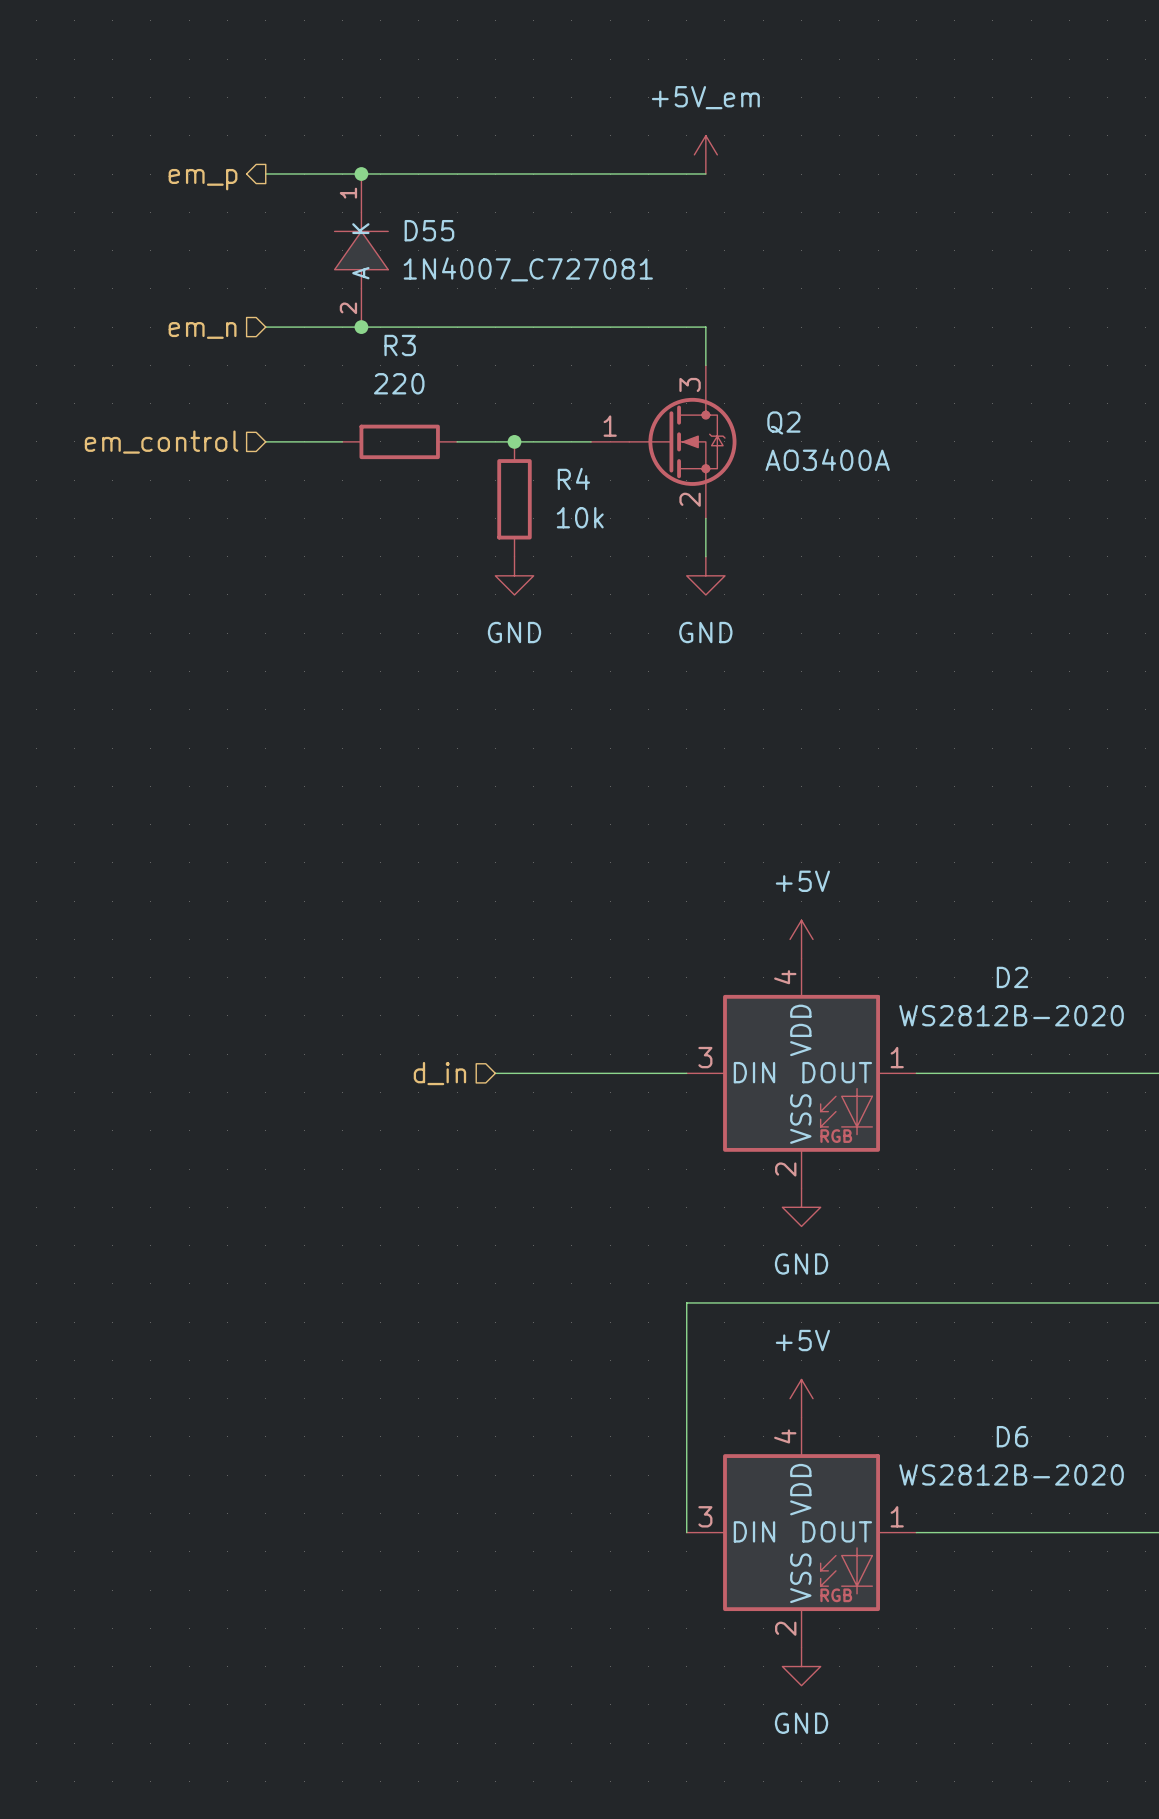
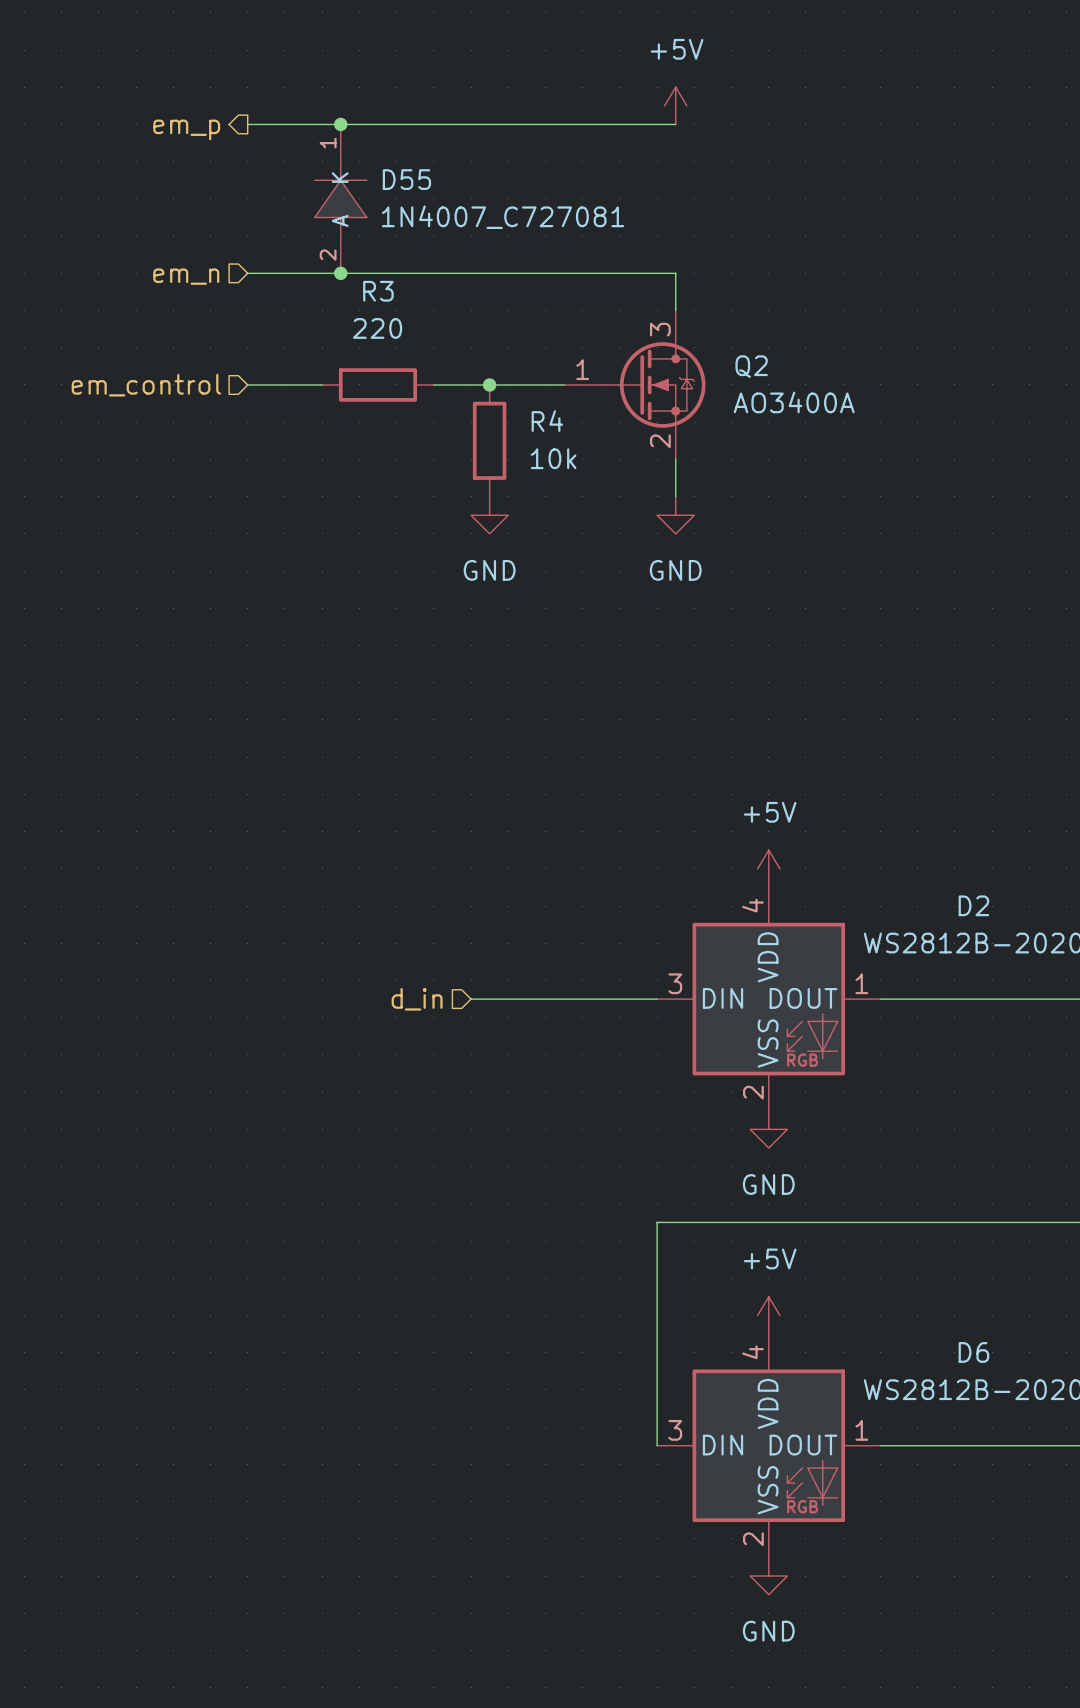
power symbol: +5V_em (705, 154) -> +5V (675, 105)

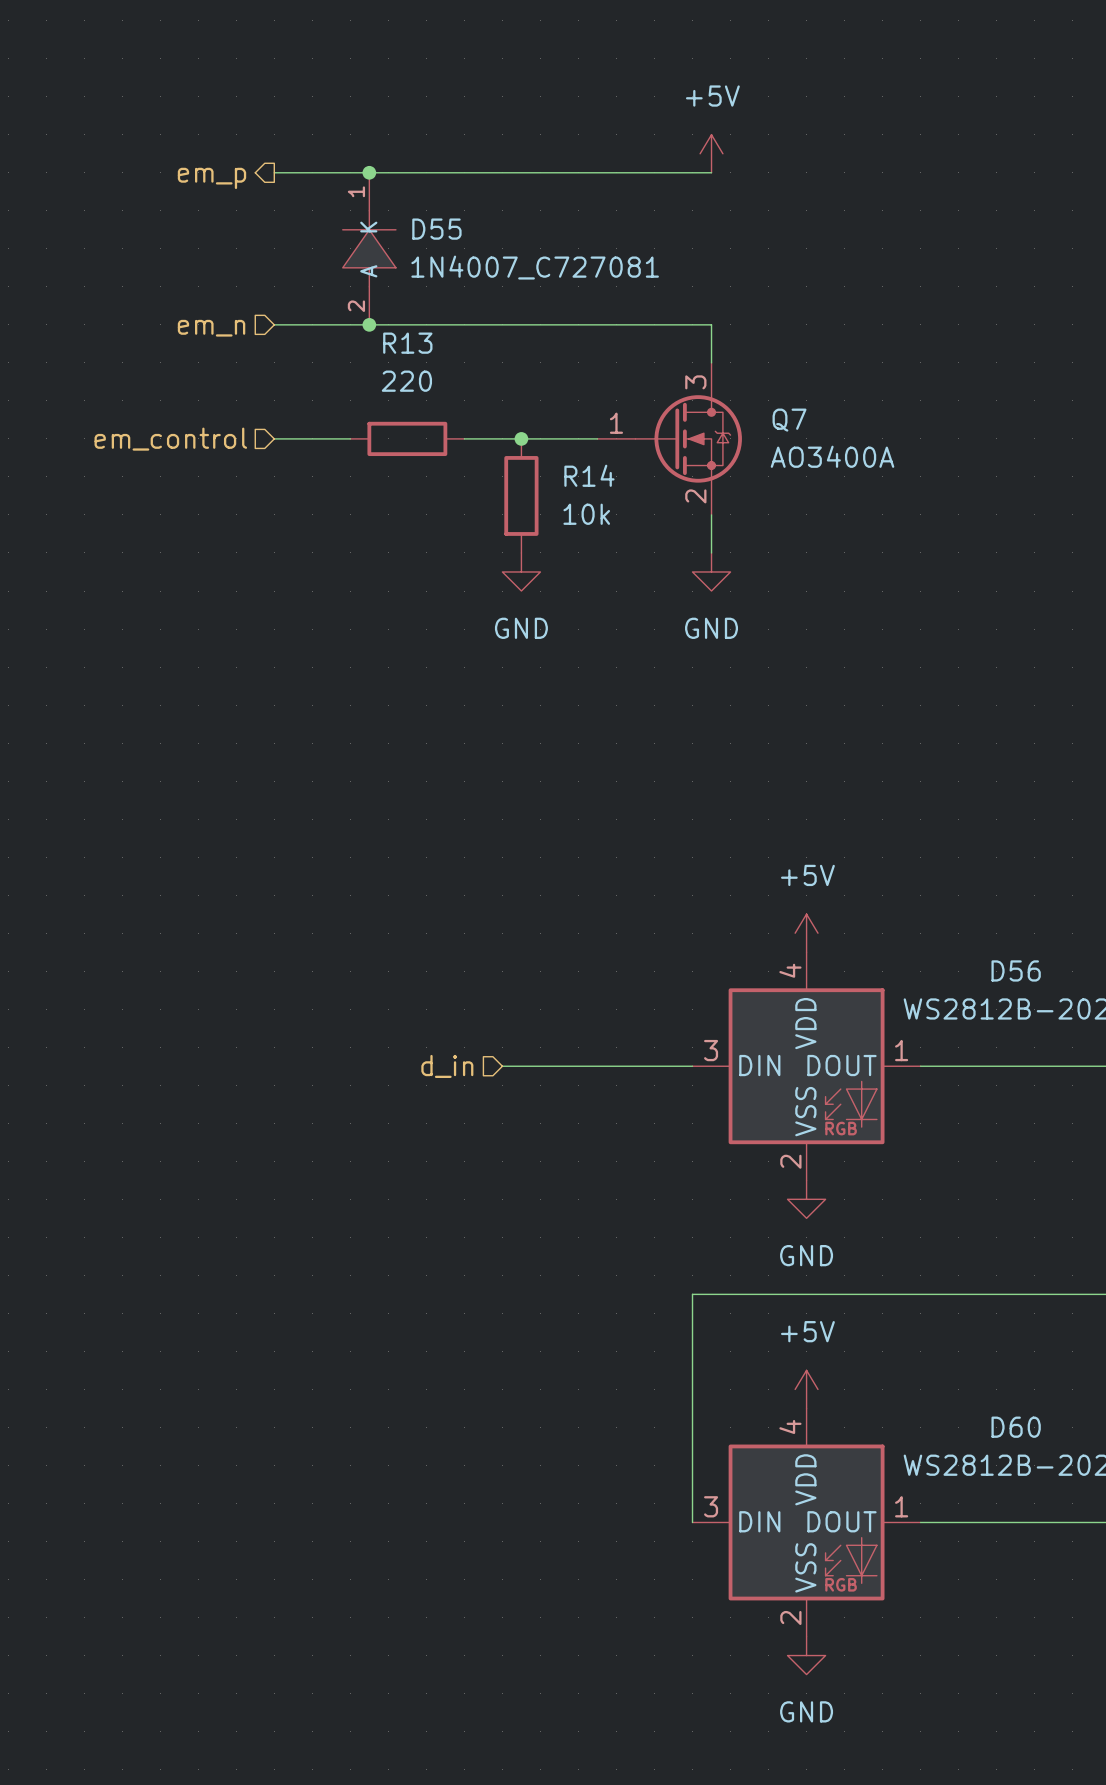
R3 name: R3 (378, 291) -> R13 (407, 343)
Q2 name: Q2 (751, 366) -> Q7 (789, 420)
R4 name: R4 (547, 421) -> R14 (589, 475)
D2 name: D2 (973, 905) -> D56 (1016, 970)
D6 name: D6 (973, 1352) -> D60 (1016, 1427)

